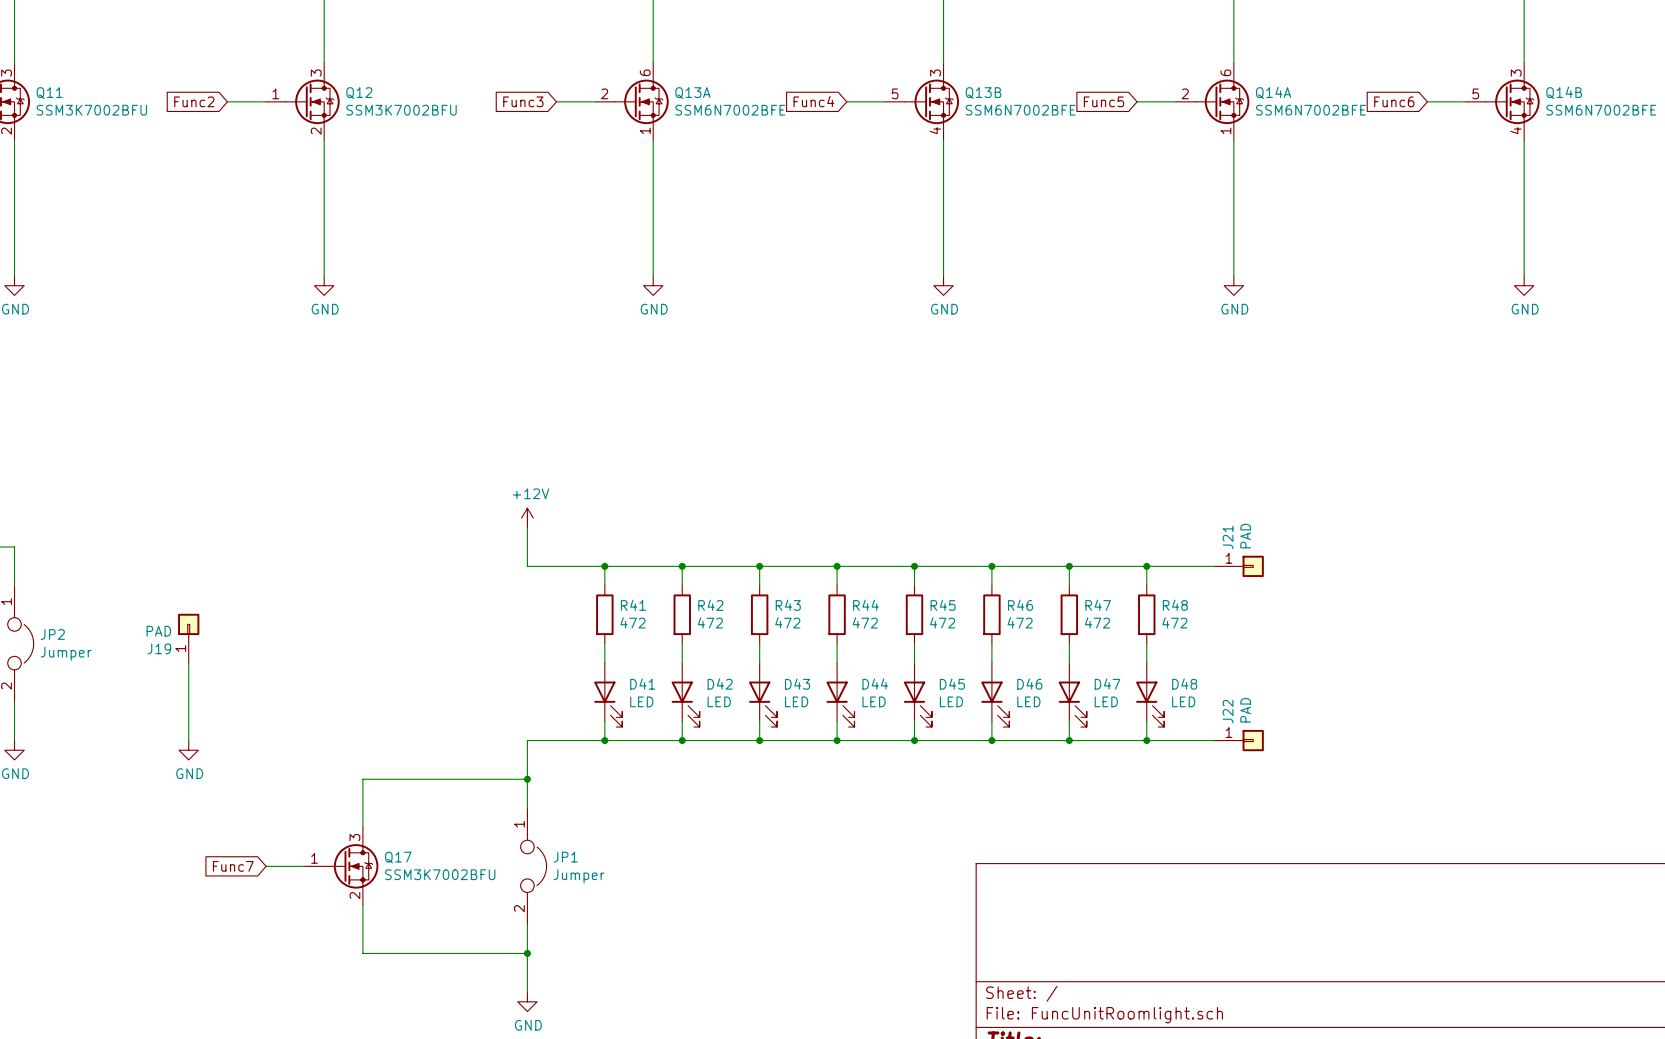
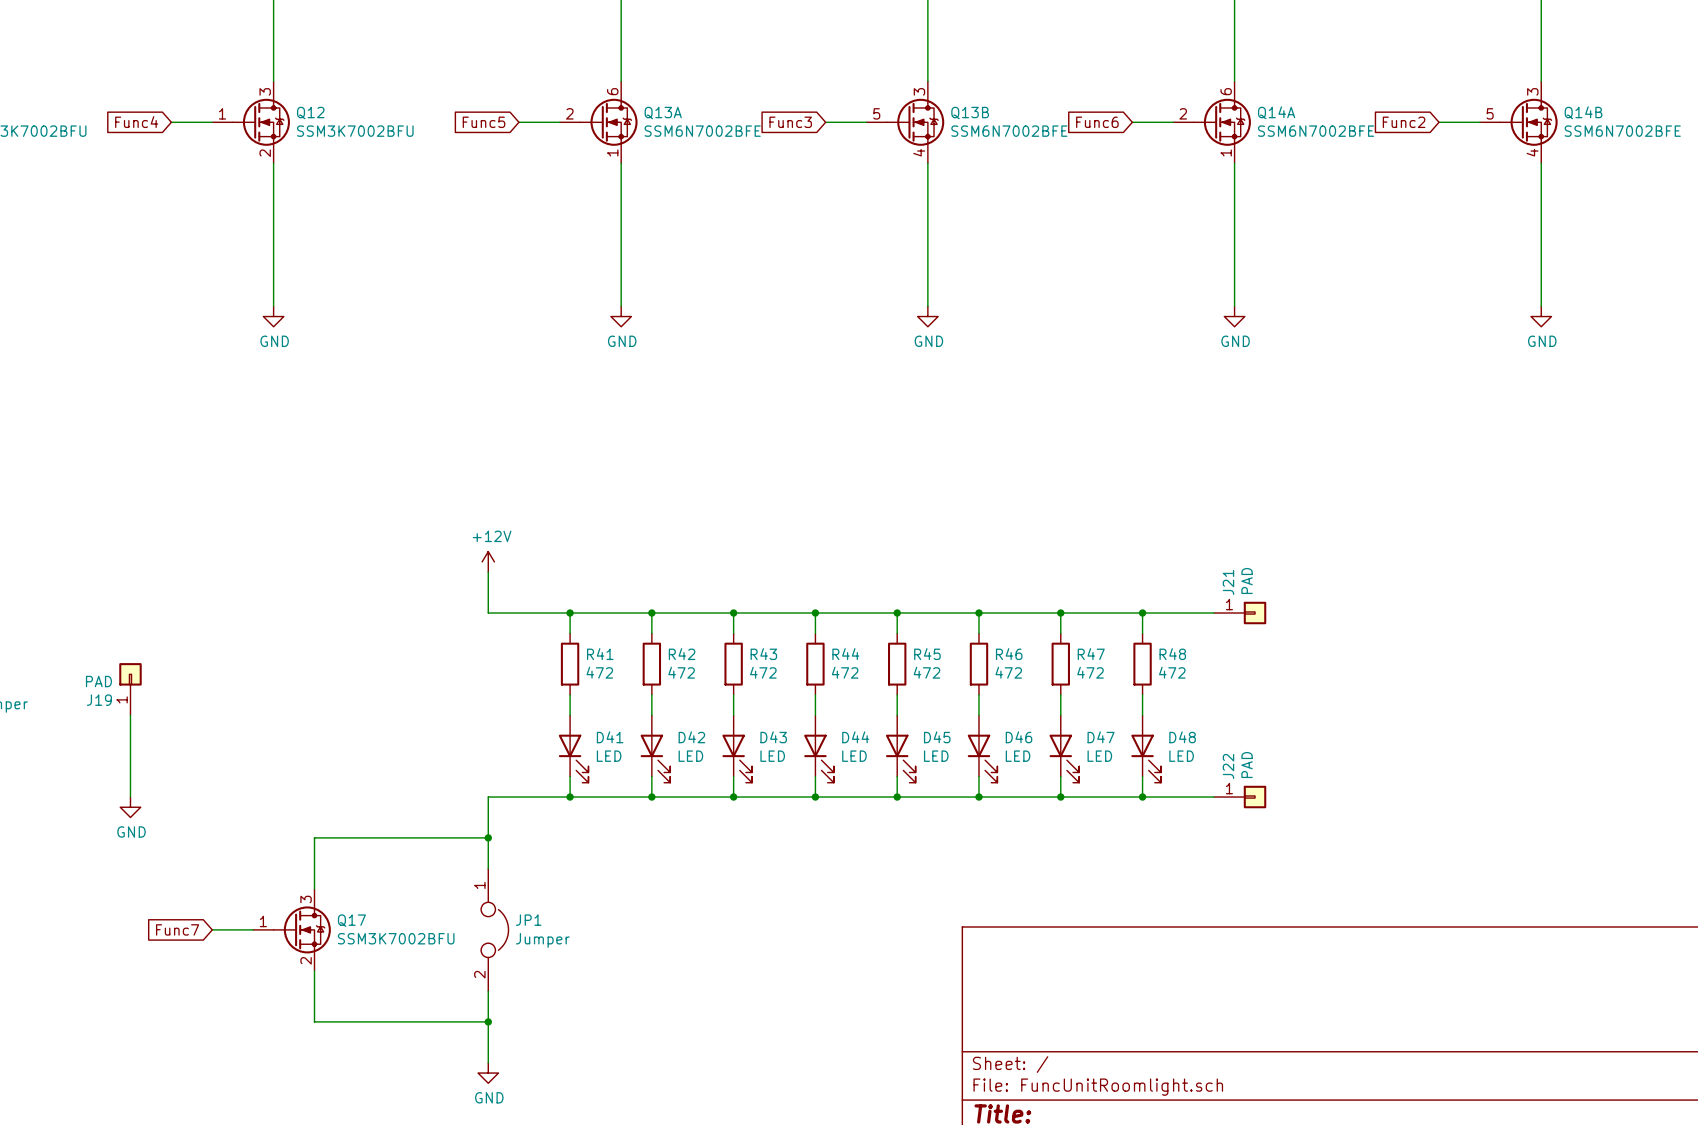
global label: Func2 (194, 101) -> Func4 (136, 122)
global label: Func3 (523, 101) -> Func5 (484, 122)
global label: Func4 (813, 101) -> Func3 (790, 122)
global label: Func5 (1104, 101) -> Func6 (1097, 122)
global label: Func6 (1394, 101) -> Func2 (1404, 122)

